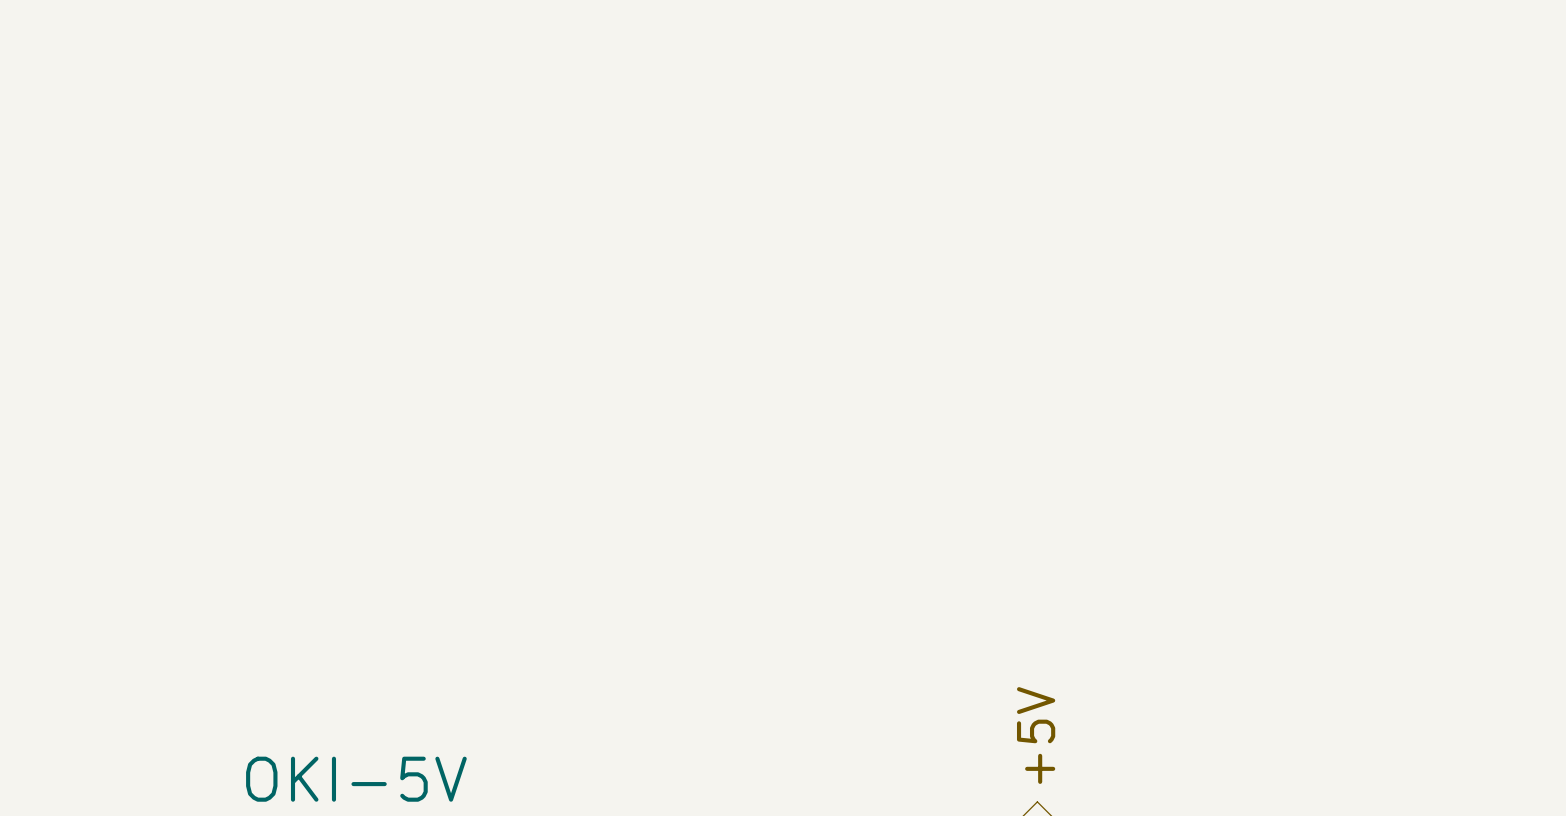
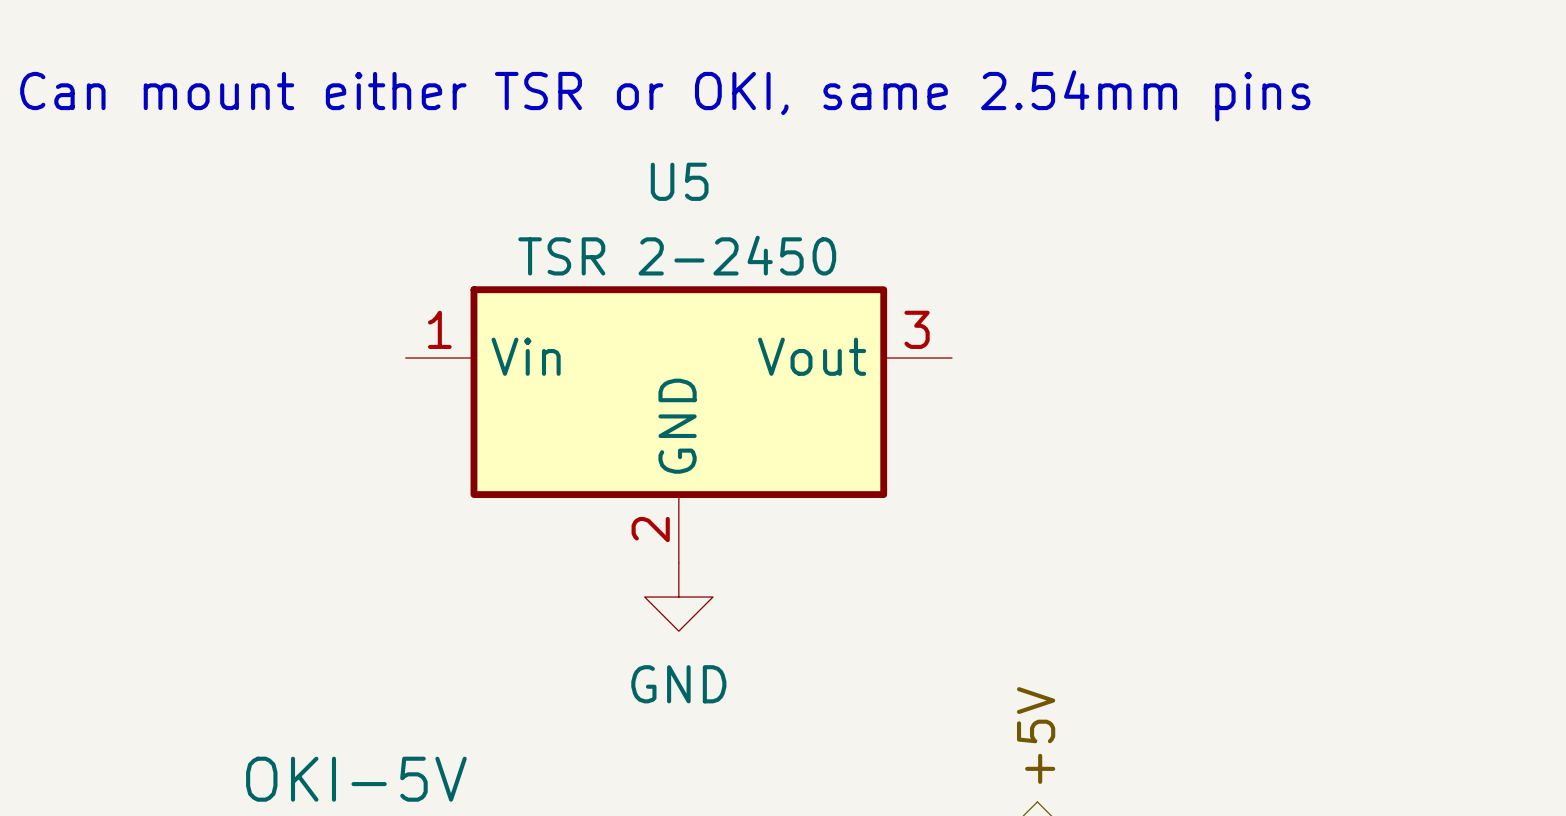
text: none -> Can mount either TSR or OKI, same 2.54mm pins (665, 95)
U5: none -> TSR 2-2450 (678, 424)
power symbol: none -> GND (678, 597)

